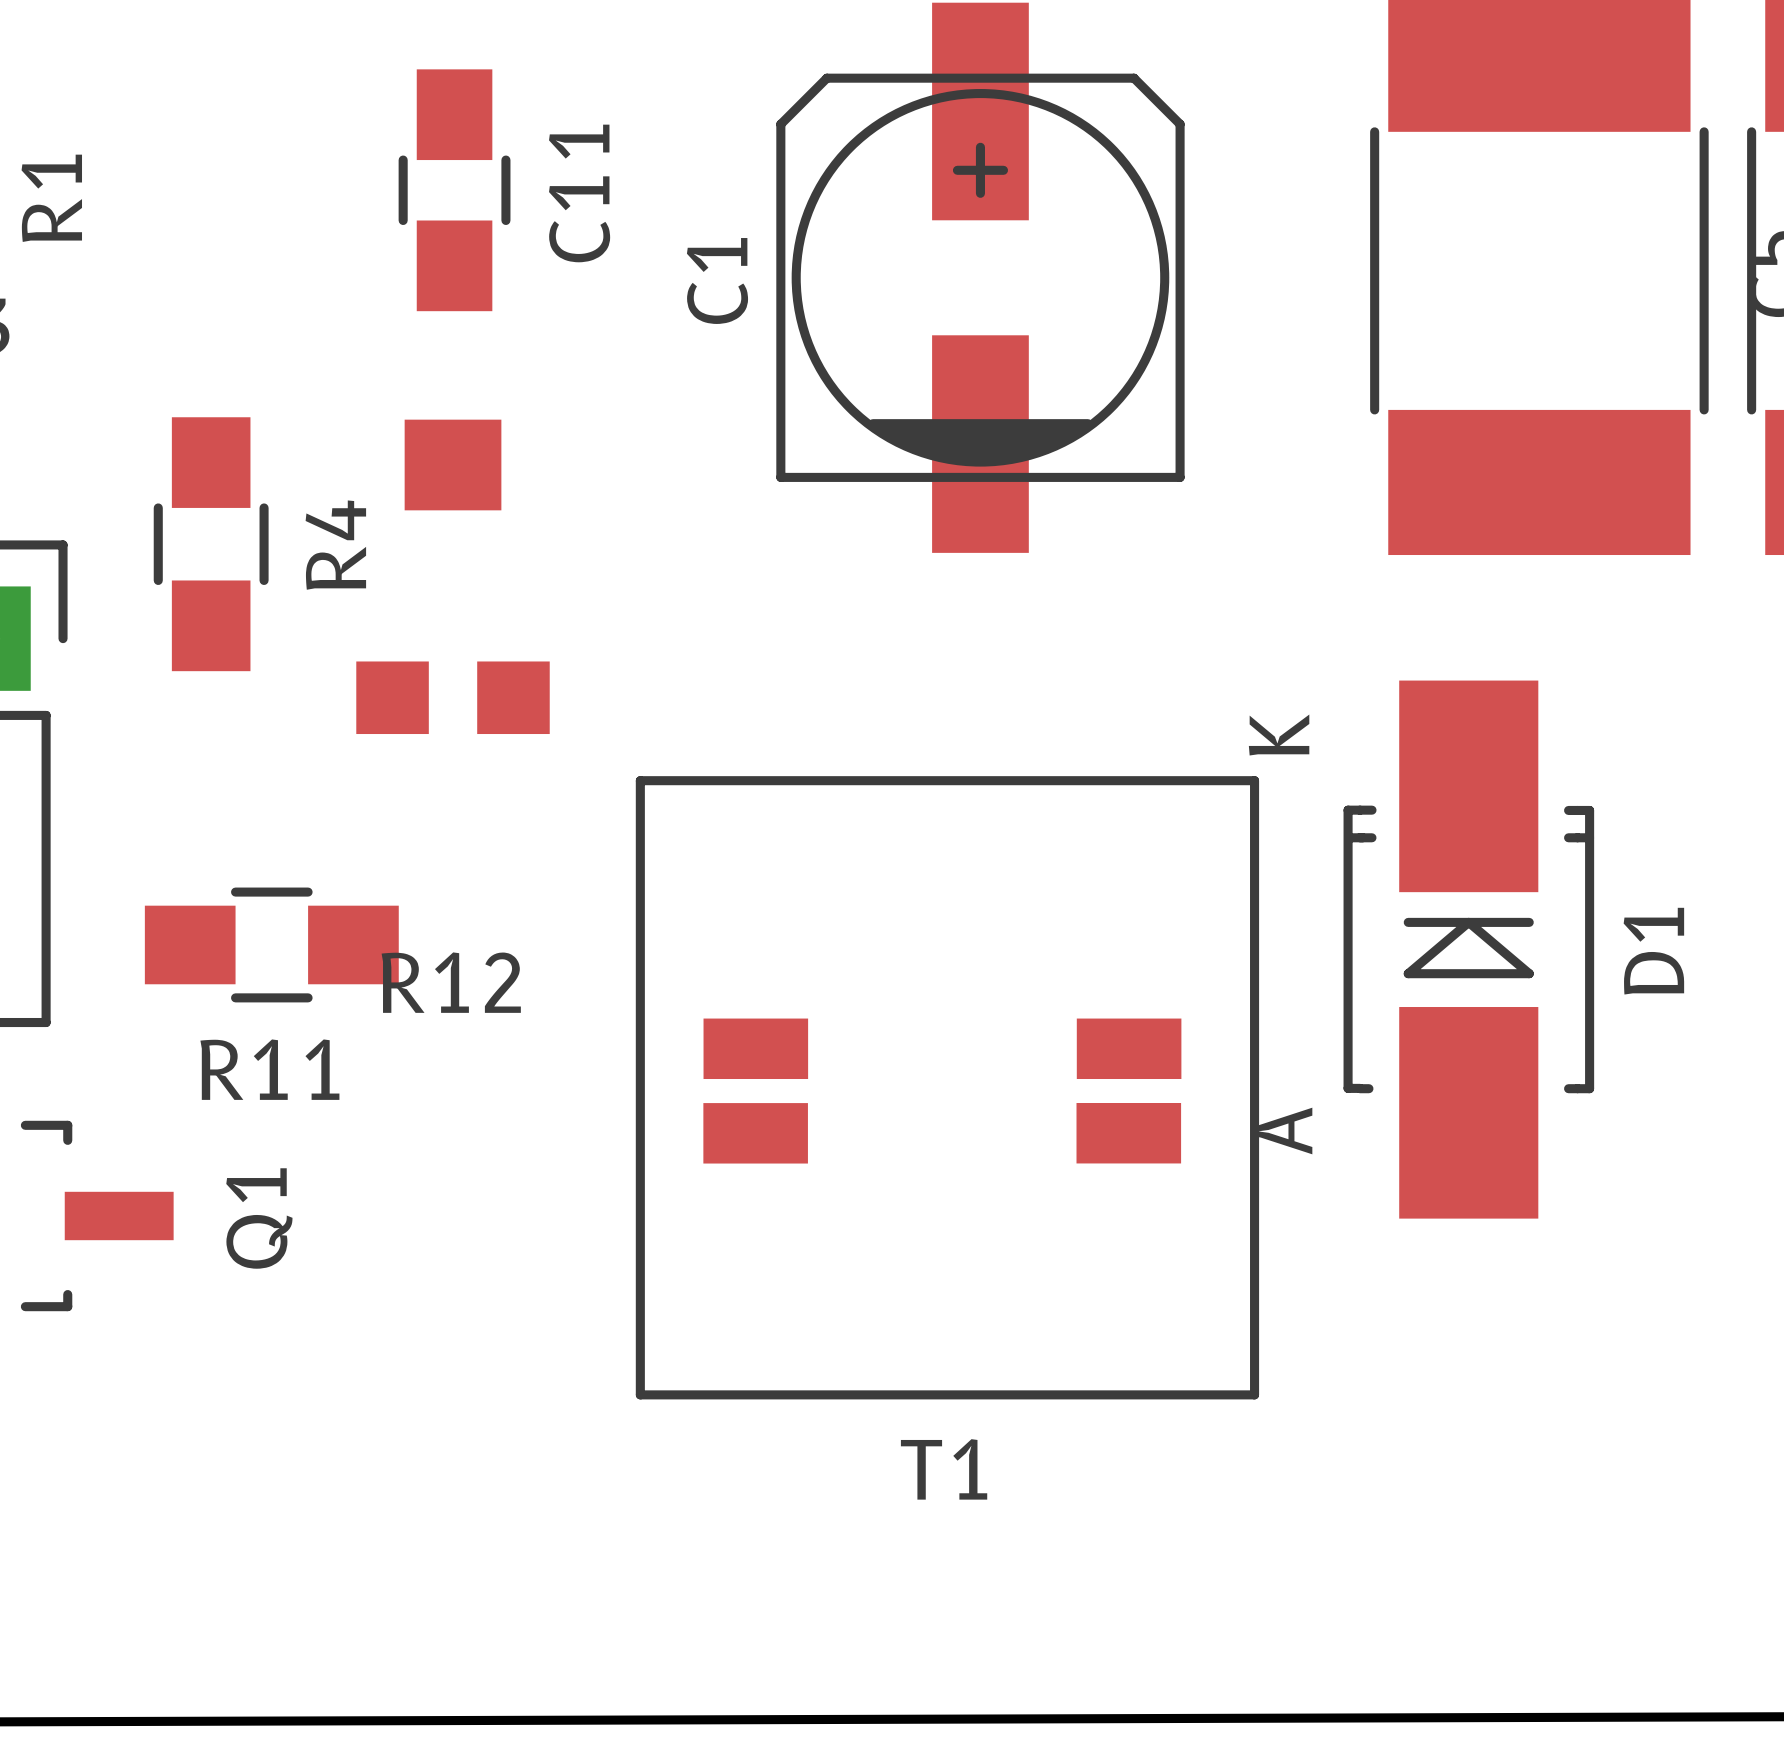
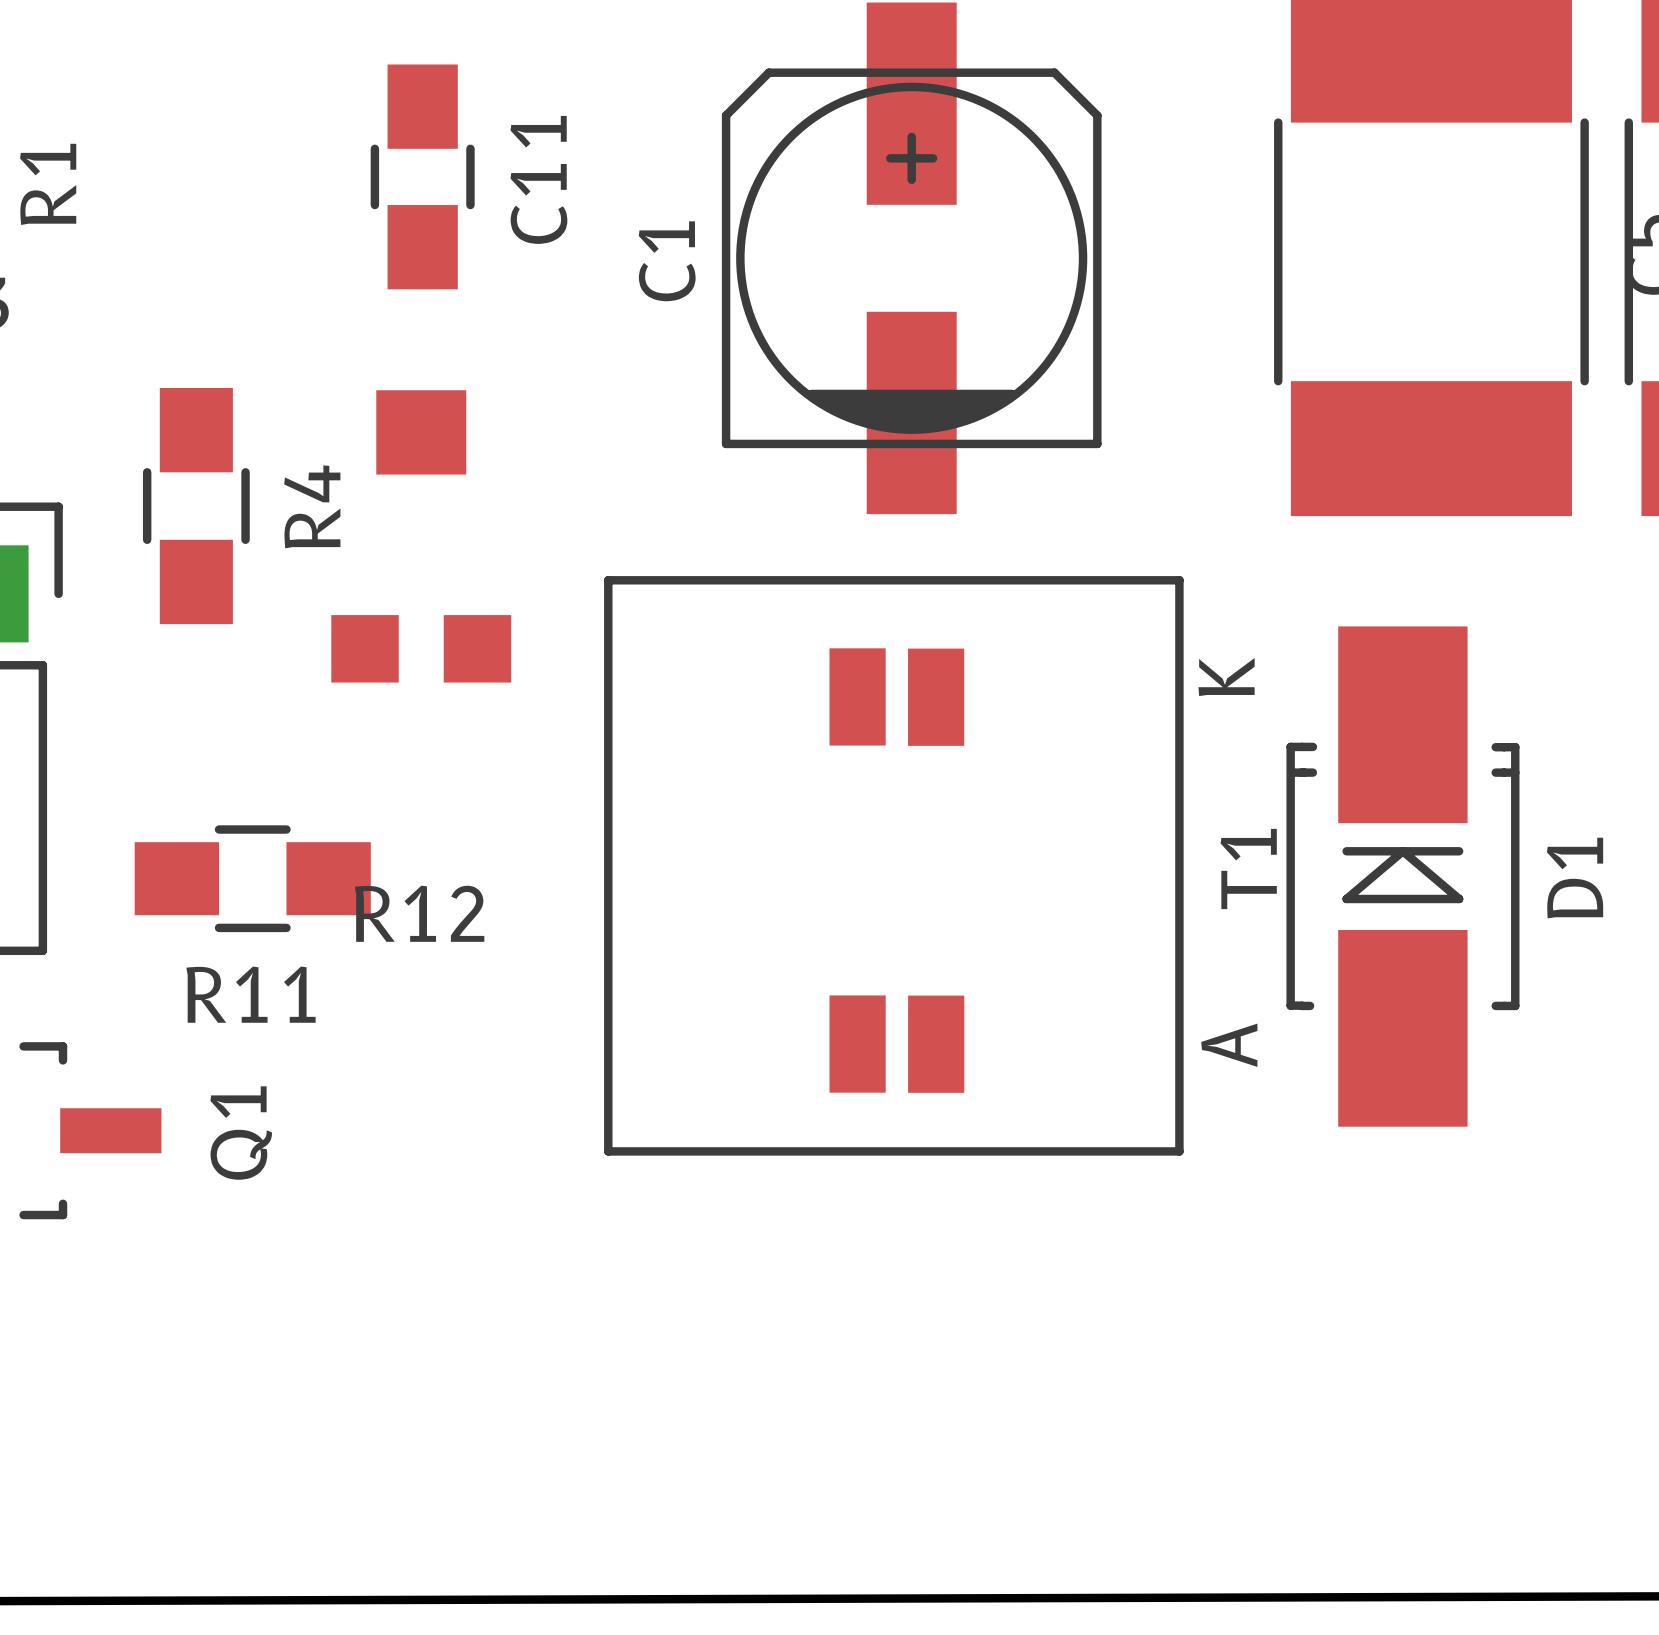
D1 position: (1468, 949) -> (1402, 876)
T1 rotation: 0° (947, 1087) -> 90° counterclockwise (893, 865)

